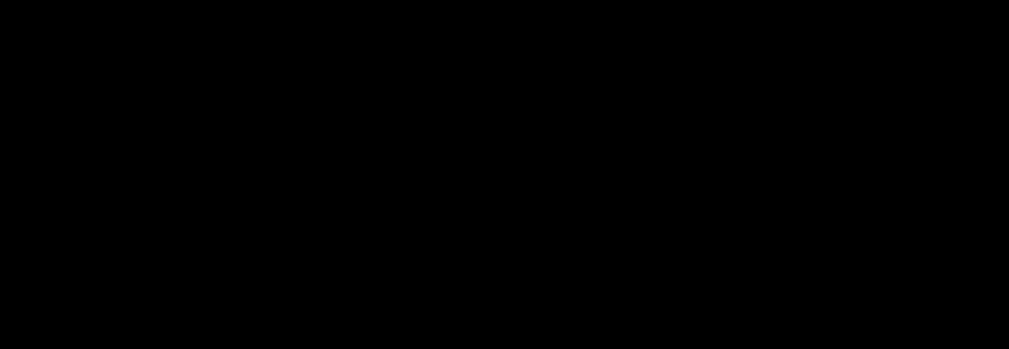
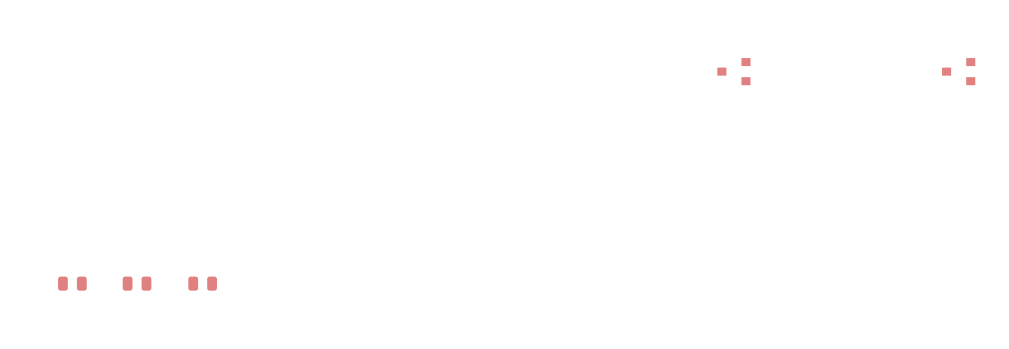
part: none -> (733, 71)
part: none -> (958, 71)
part: none -> (72, 283)
part: none -> (137, 283)
part: none -> (202, 283)

